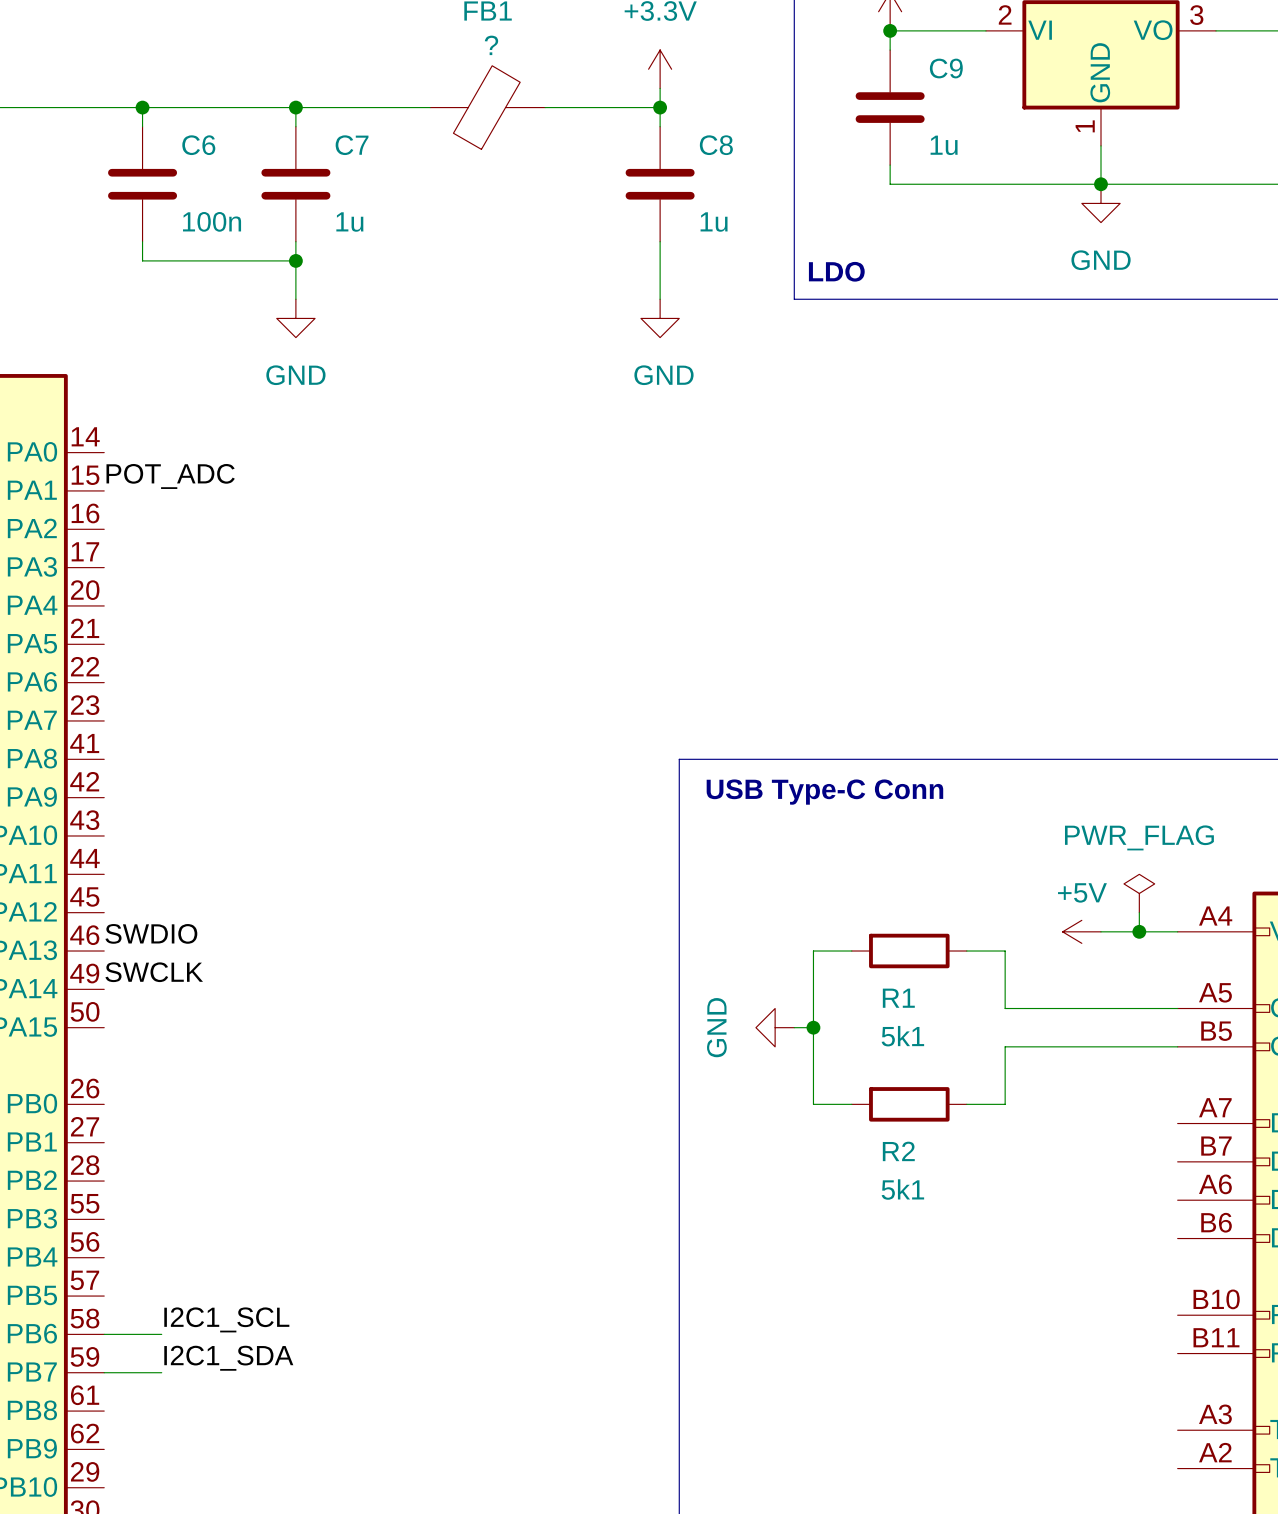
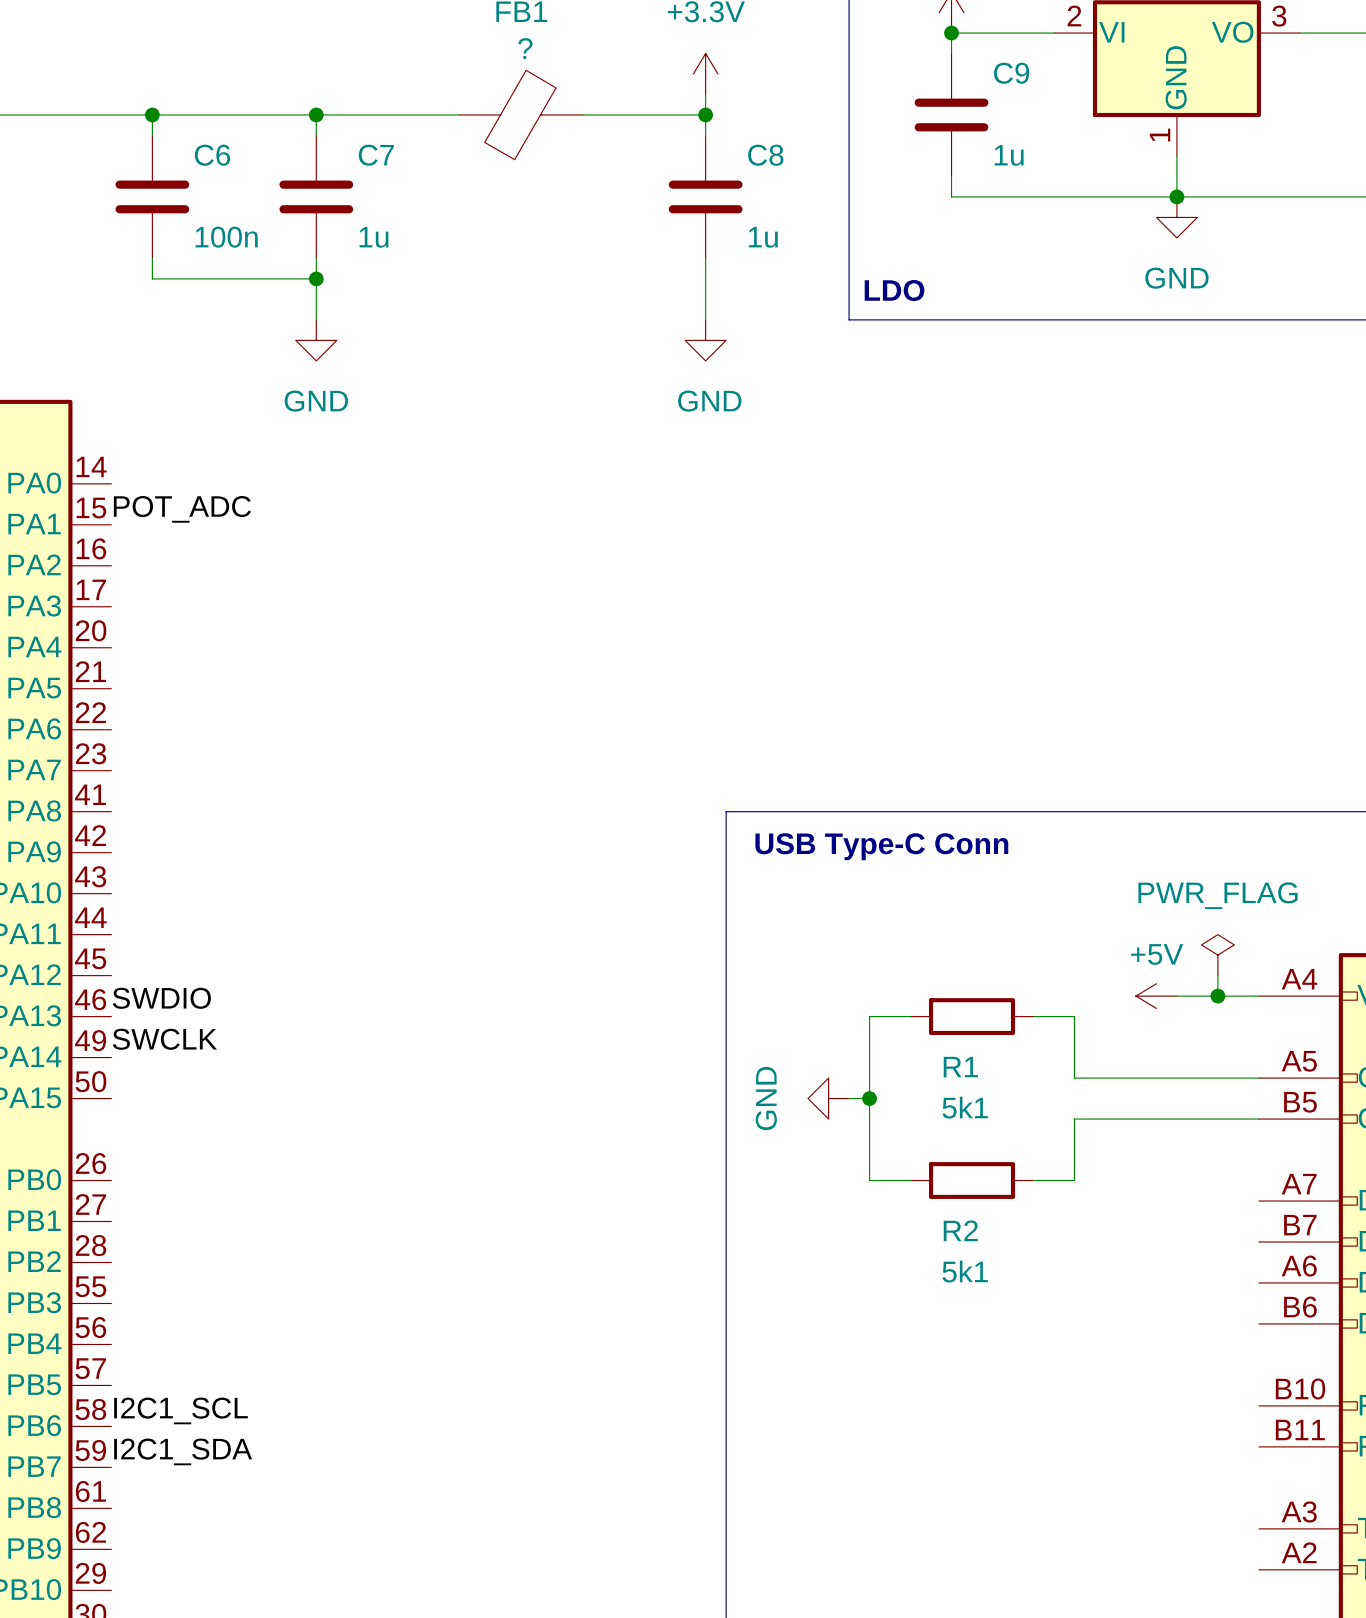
label position: I2C1_SCL (226, 1319) -> I2C1_SCL (180, 1410)
wire: (104, 1334) (161, 1334) -> none
label position: I2C1_SDA (228, 1358) -> I2C1_SDA (183, 1451)
wire: (104, 1372) (161, 1372) -> none

